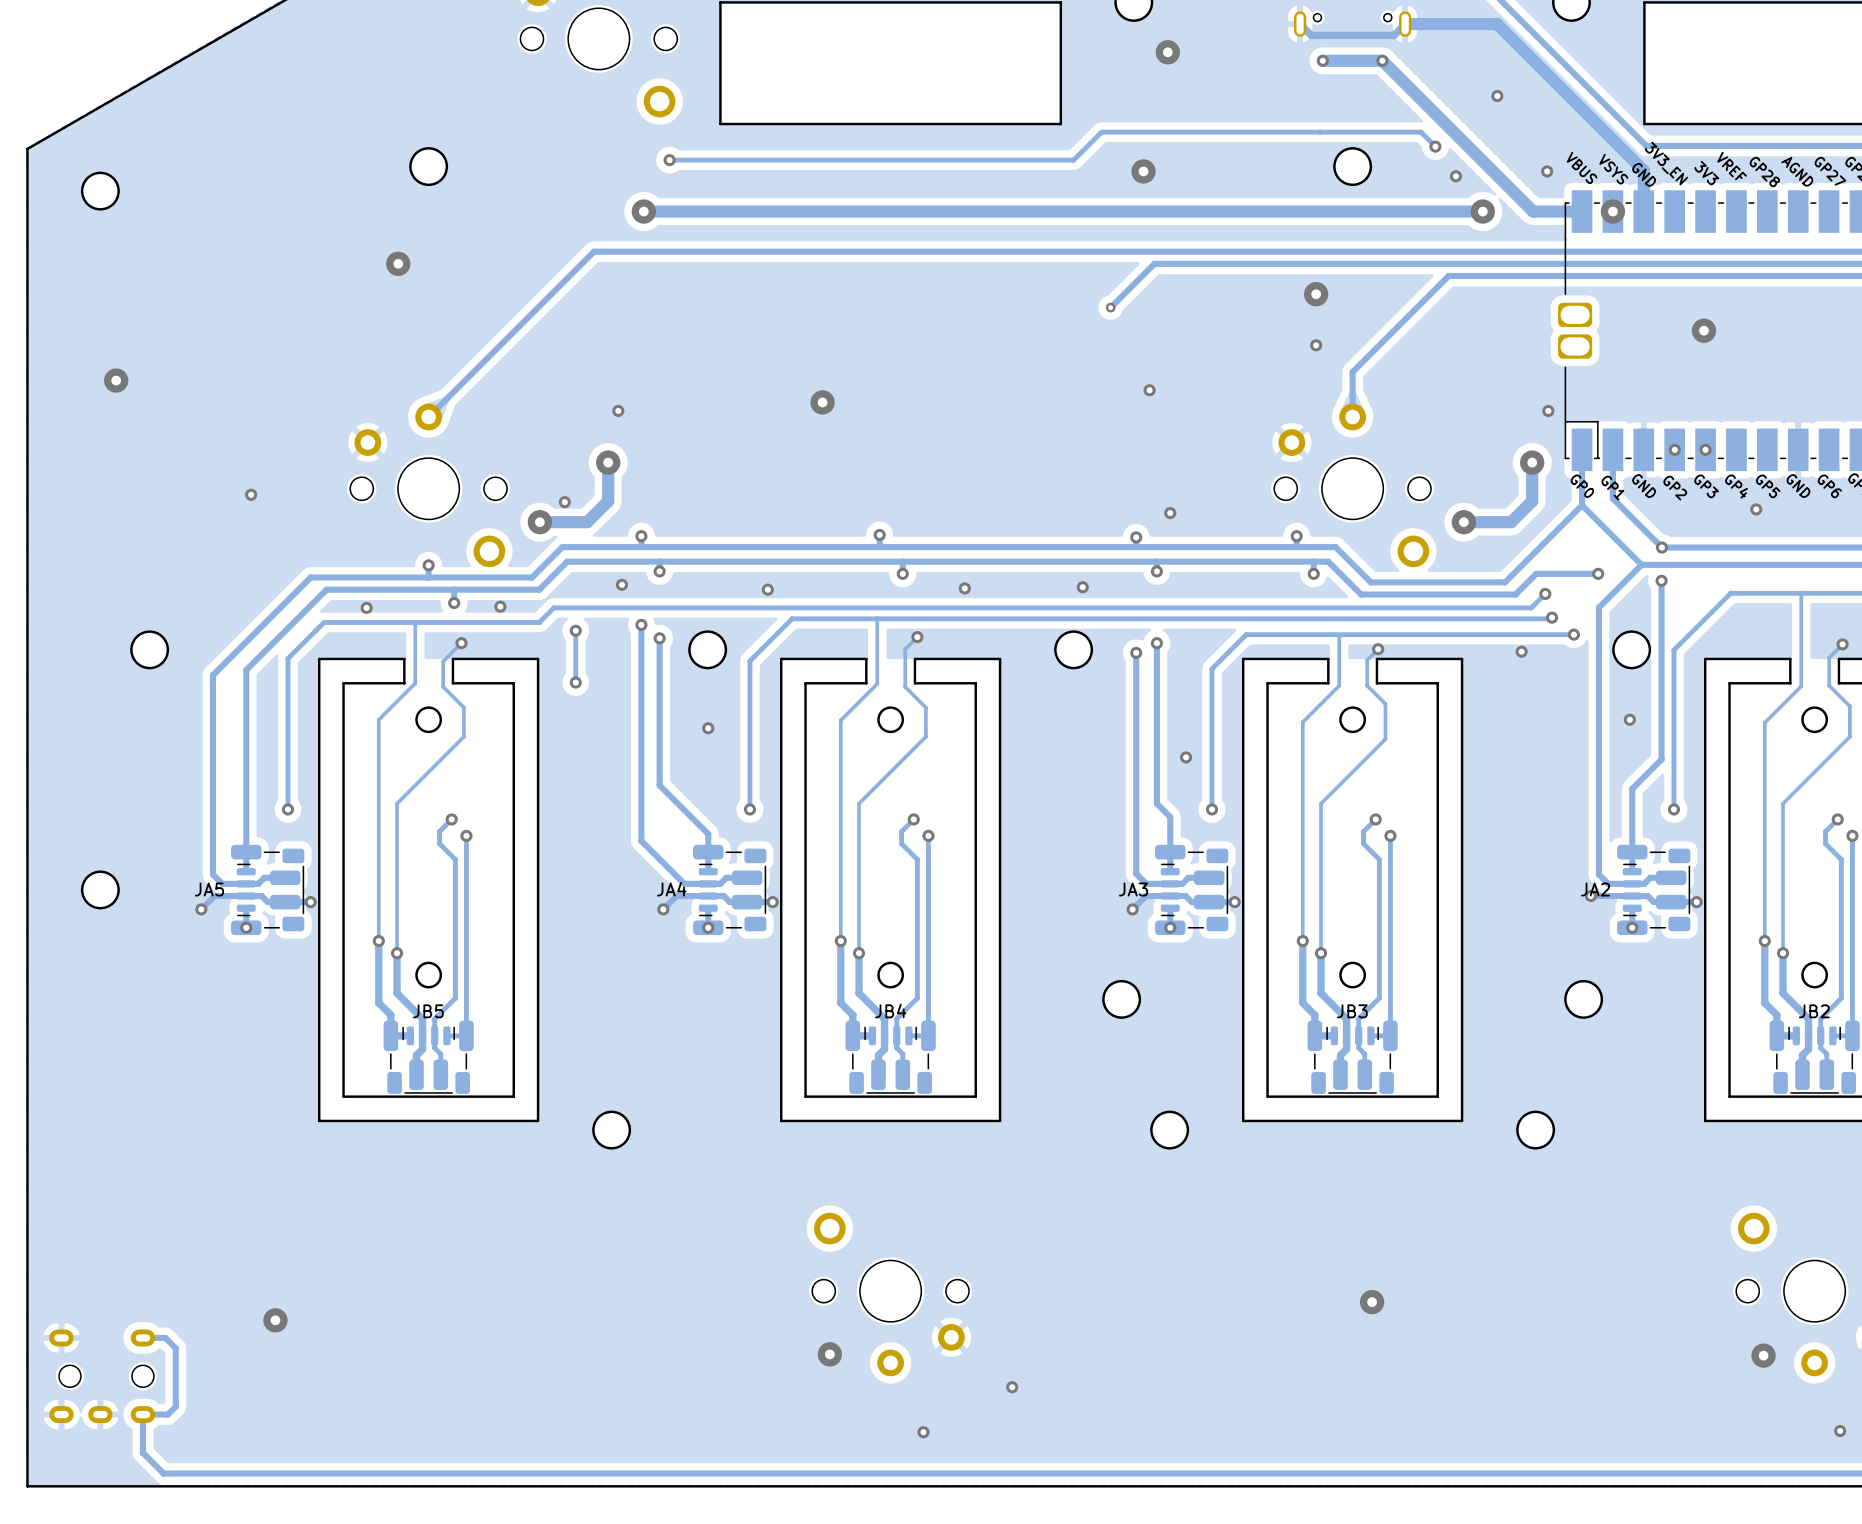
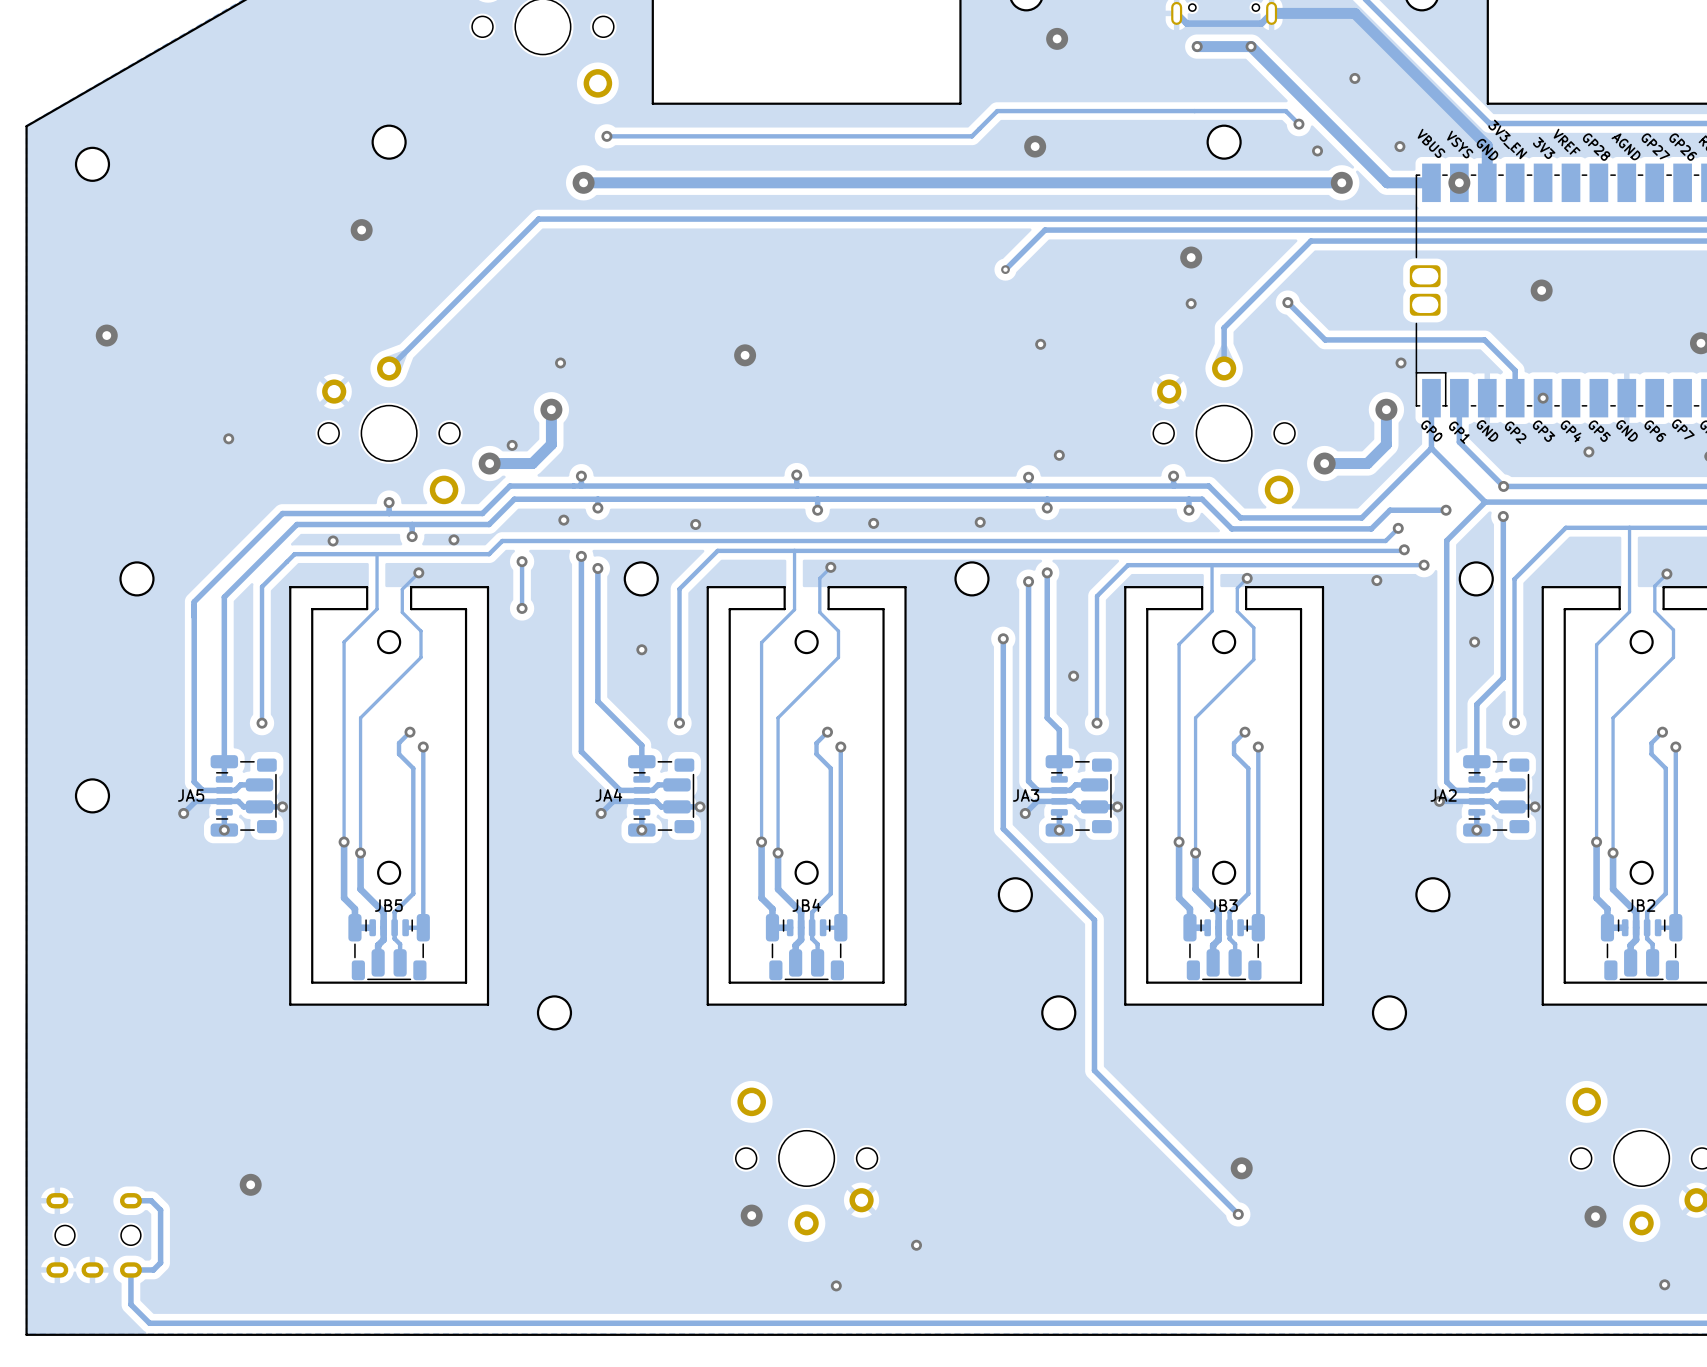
track: none -> (1287, 302) (1325, 339) (1484, 339) (1515, 370) (1515, 398)
via: none -> (1287, 302)
via: (1674, 449) -> none
track: none -> (1003, 638) (1003, 828) (1094, 920) (1094, 1070) (1238, 1214)
via: none -> (1003, 638)
via: none -> (1238, 1214)

